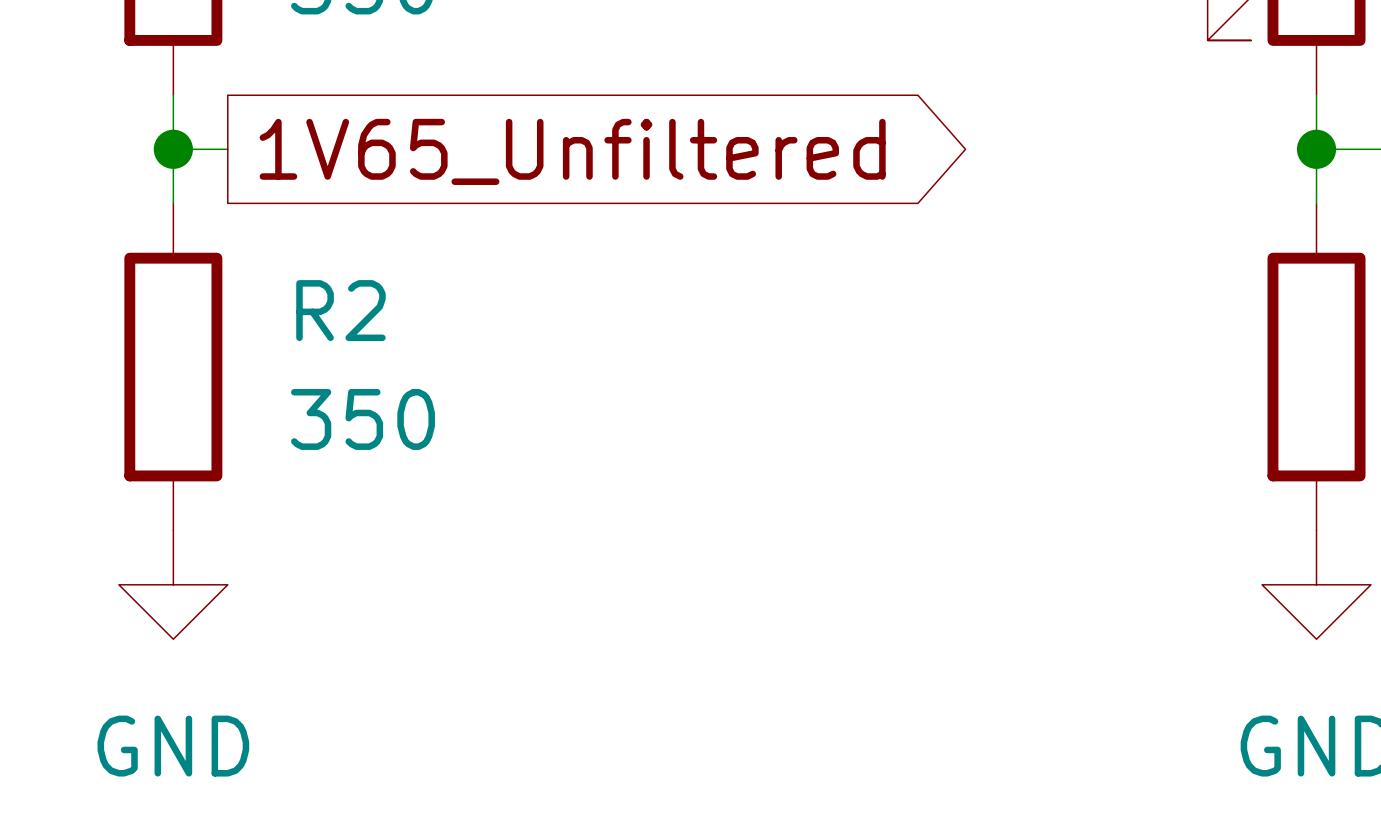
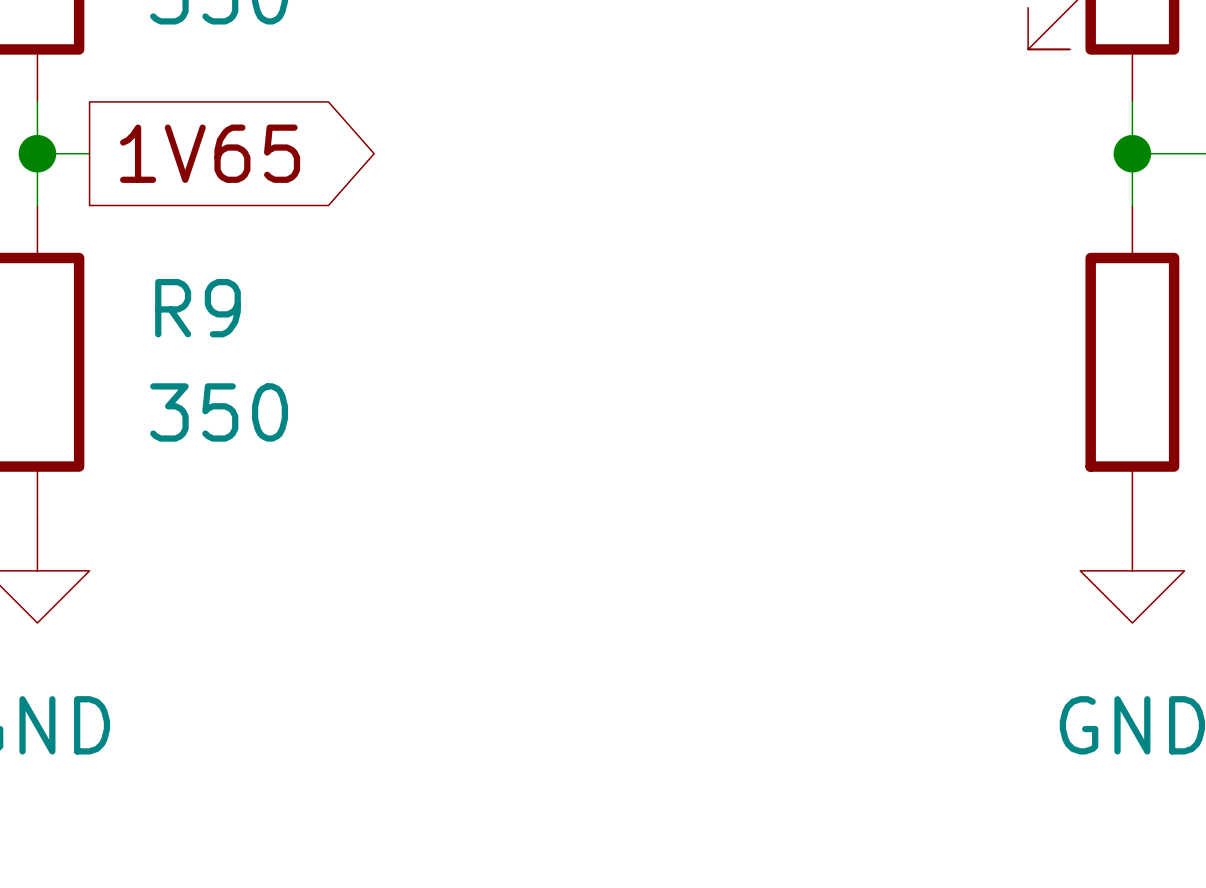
global label: 1V65_Unfiltered (572, 151) -> 1V65 (210, 153)
R2 name: R2 (340, 310) -> R9 (197, 308)

